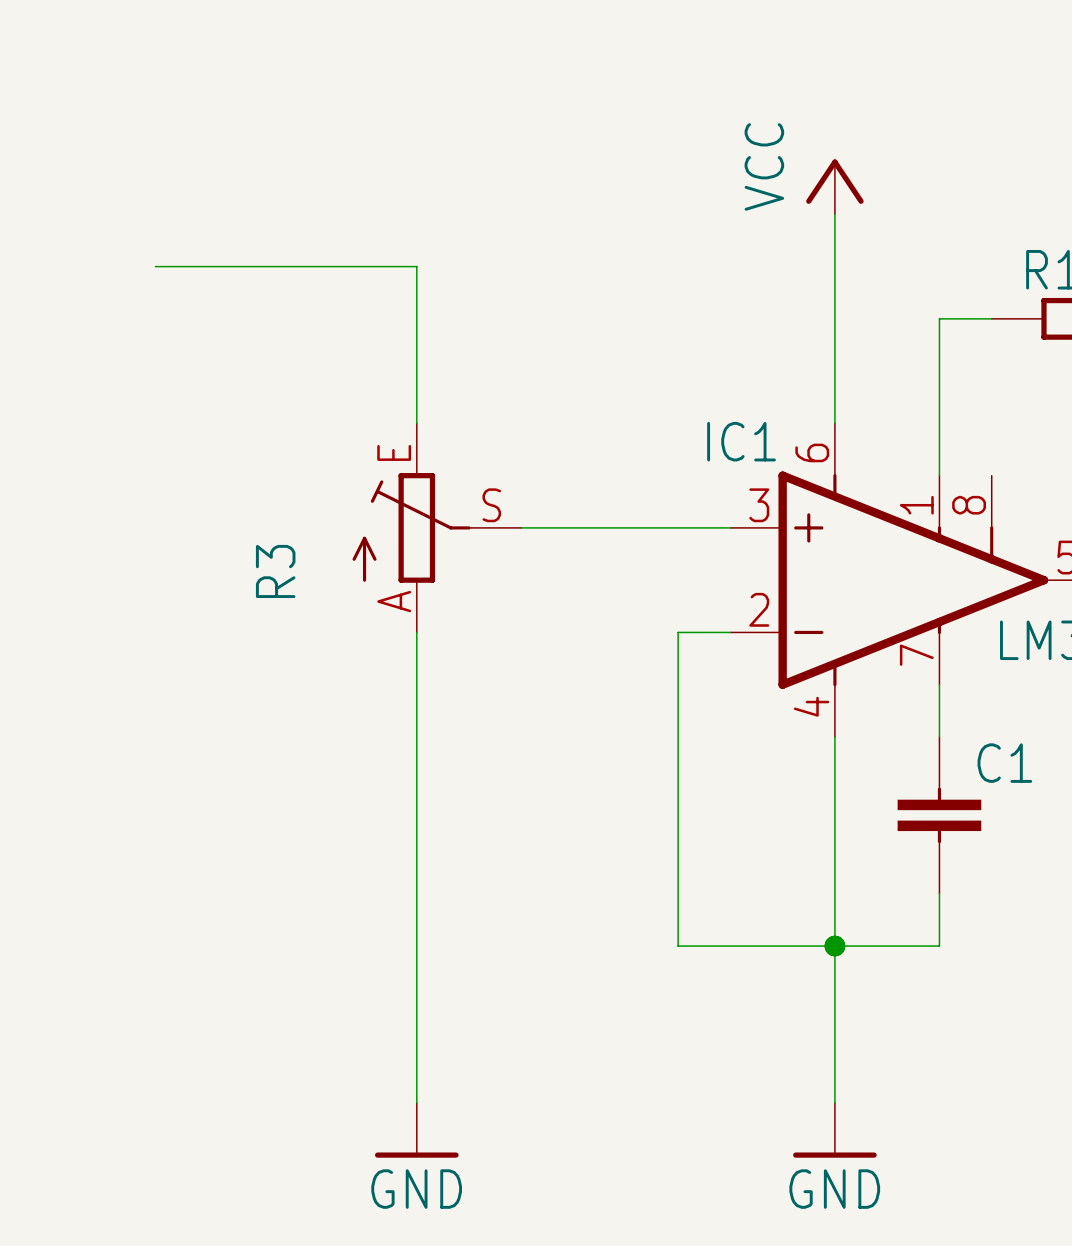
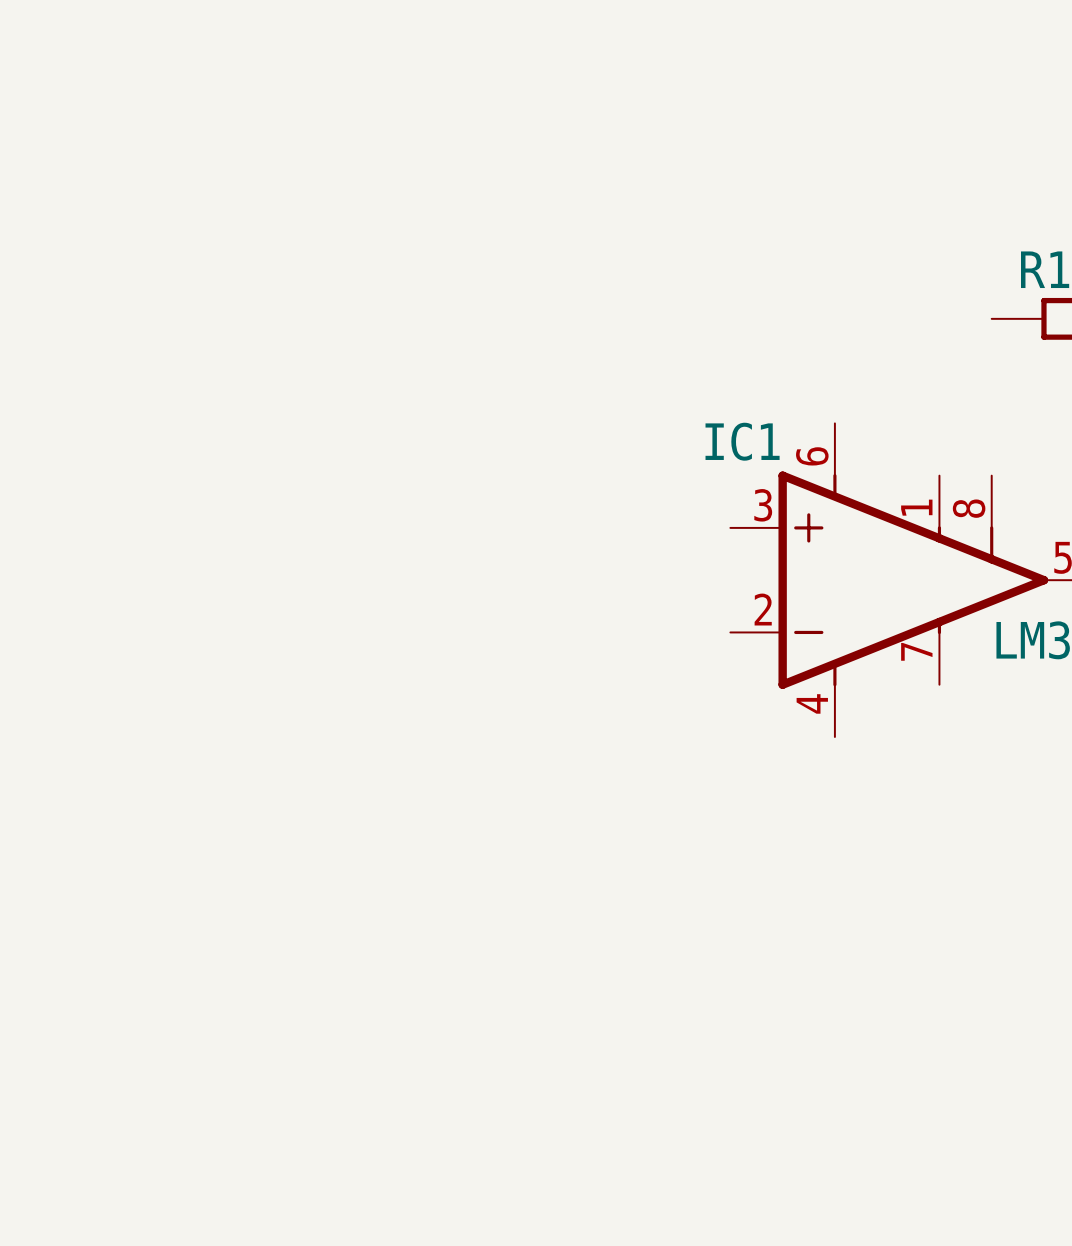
power symbol: VCC (834, 186) -> none
wire: (834, 214) (834, 423) -> none
wire: (155, 266) (416, 266) (416, 423) -> none
wire: (991, 318) (939, 318) (939, 475) -> none
R3: (436, 527) -> none
wire: (521, 527) (730, 527) -> none
wire: (416, 632) (416, 1102) -> none
wire: (730, 632) (678, 632) (678, 946) (939, 946) (939, 893) -> none
wire: (939, 684) (939, 736) -> none
wire: (834, 736) (834, 1102) -> none
C1: (939, 815) -> none
junction: (834, 946) -> none
power symbol: GND (416, 1130) -> none
power symbol: GND (834, 1130) -> none

